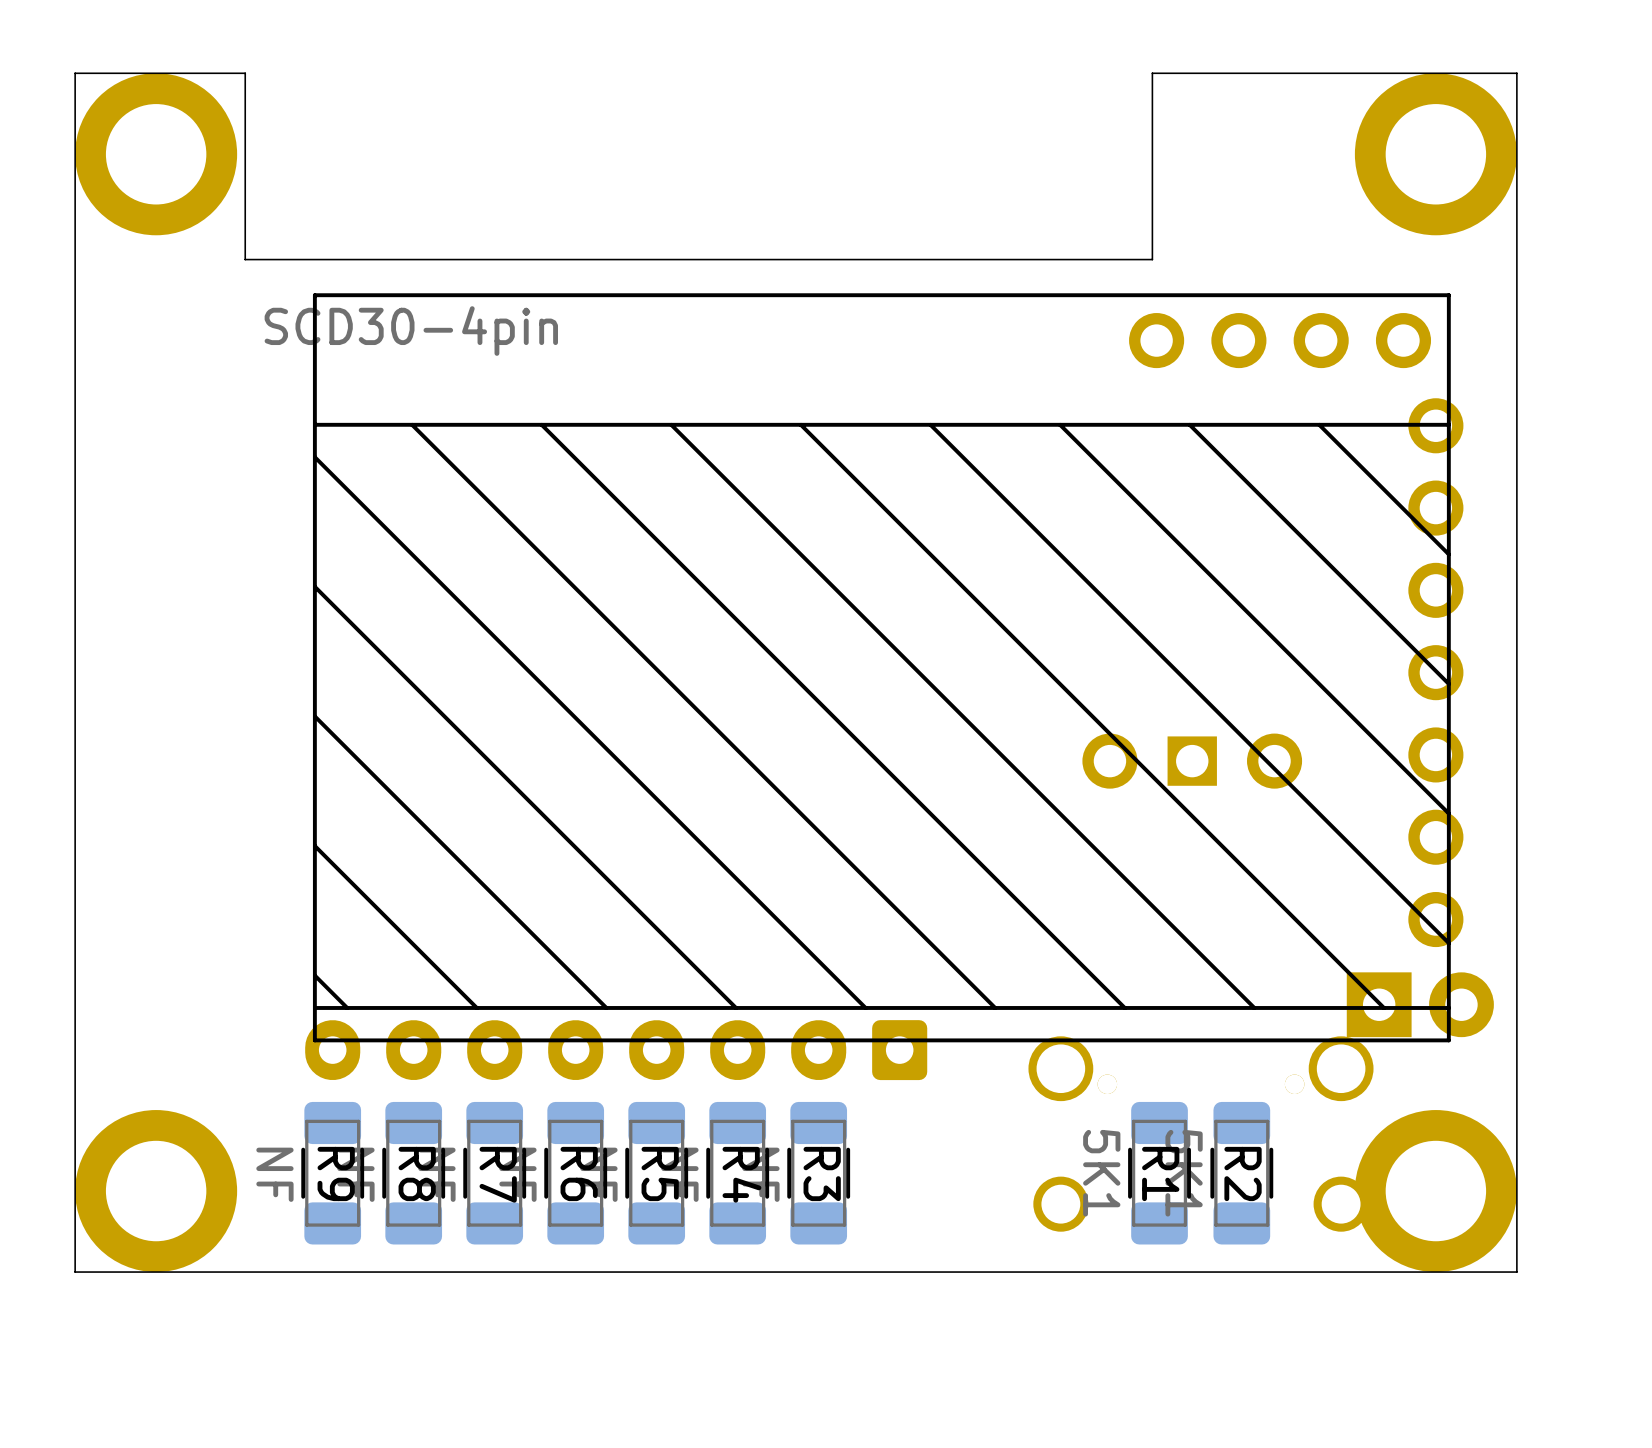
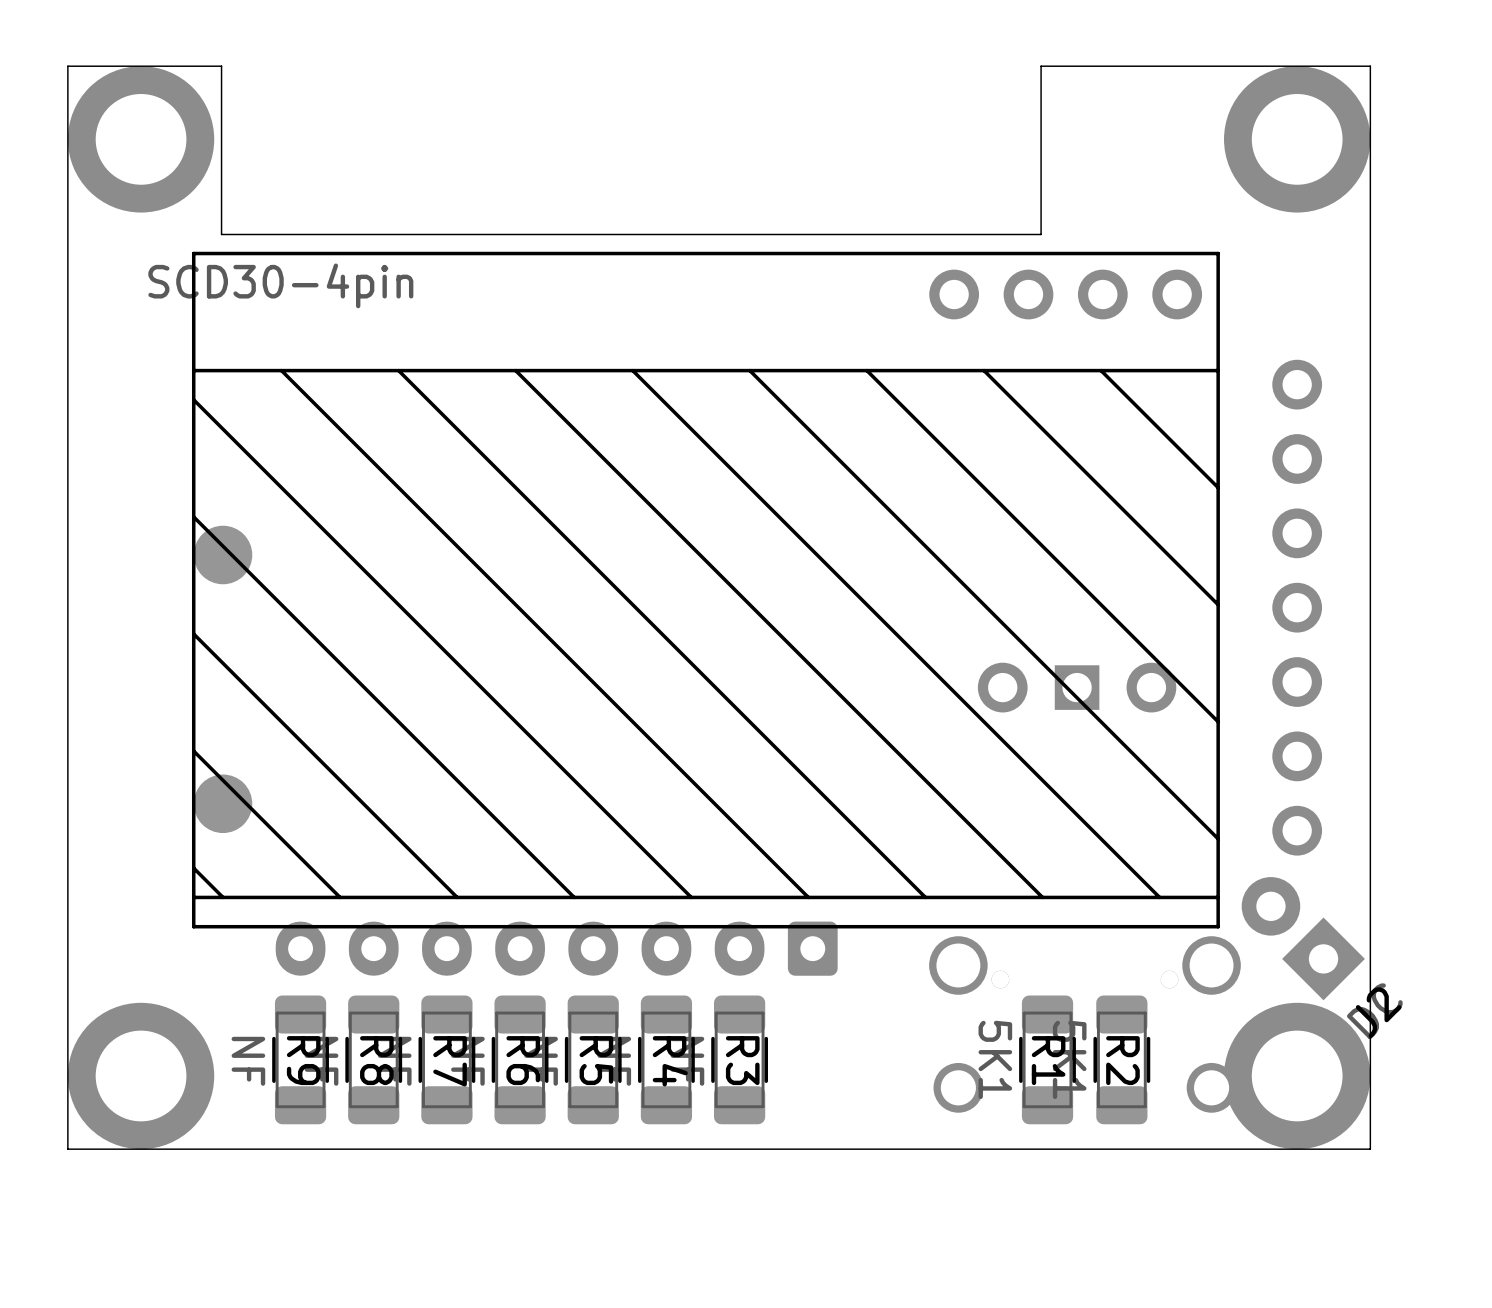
part: none -> SCD30-4pin (705, 590)
part: SCD30-4pin (881, 667) -> none
J2 side: top (1420, 1004) -> bottom (1303, 938)

